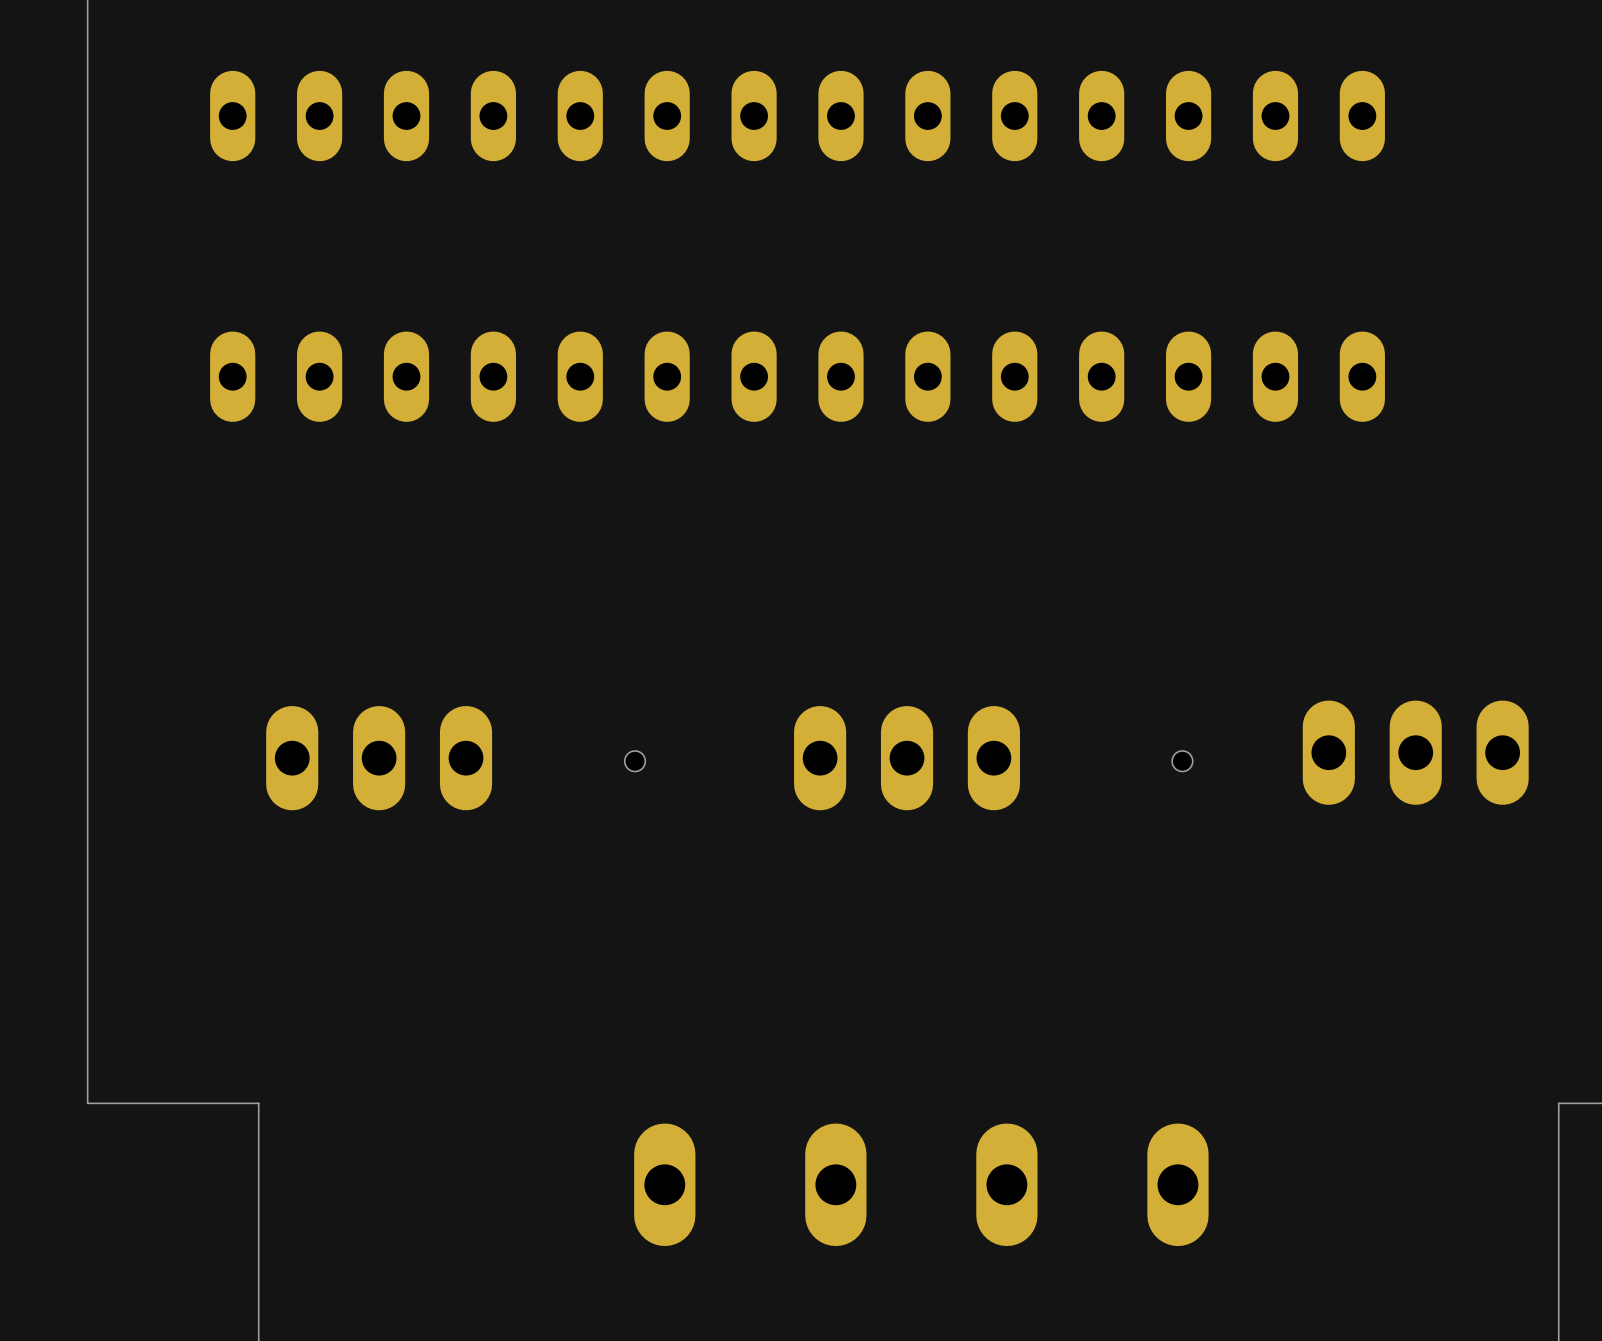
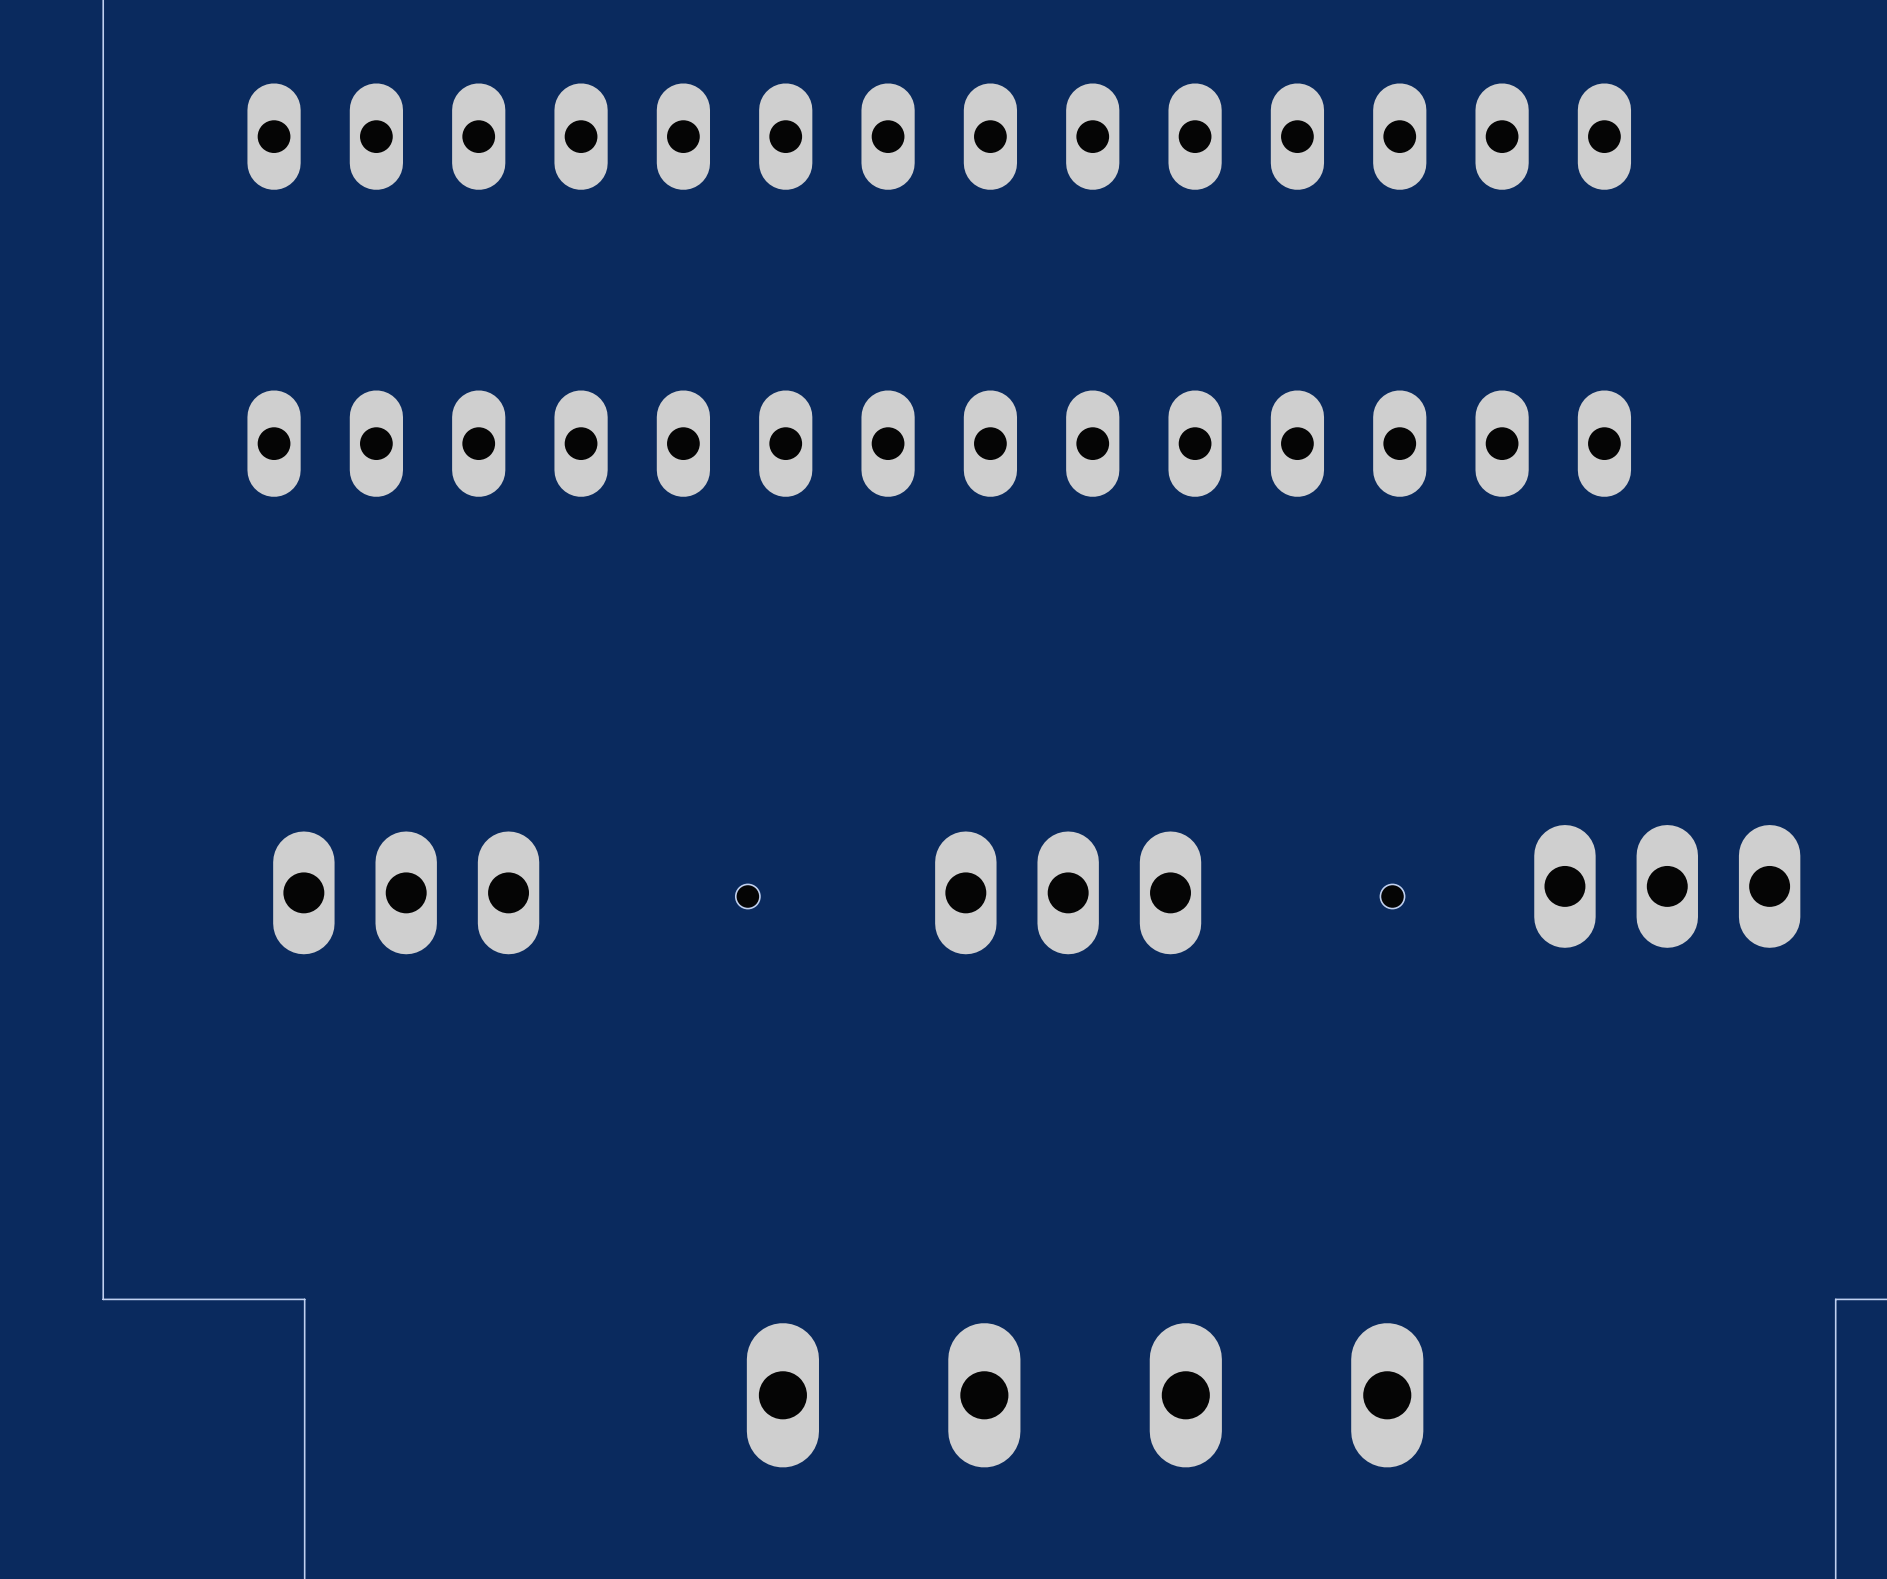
part position: (379, 758) -> (406, 892)

